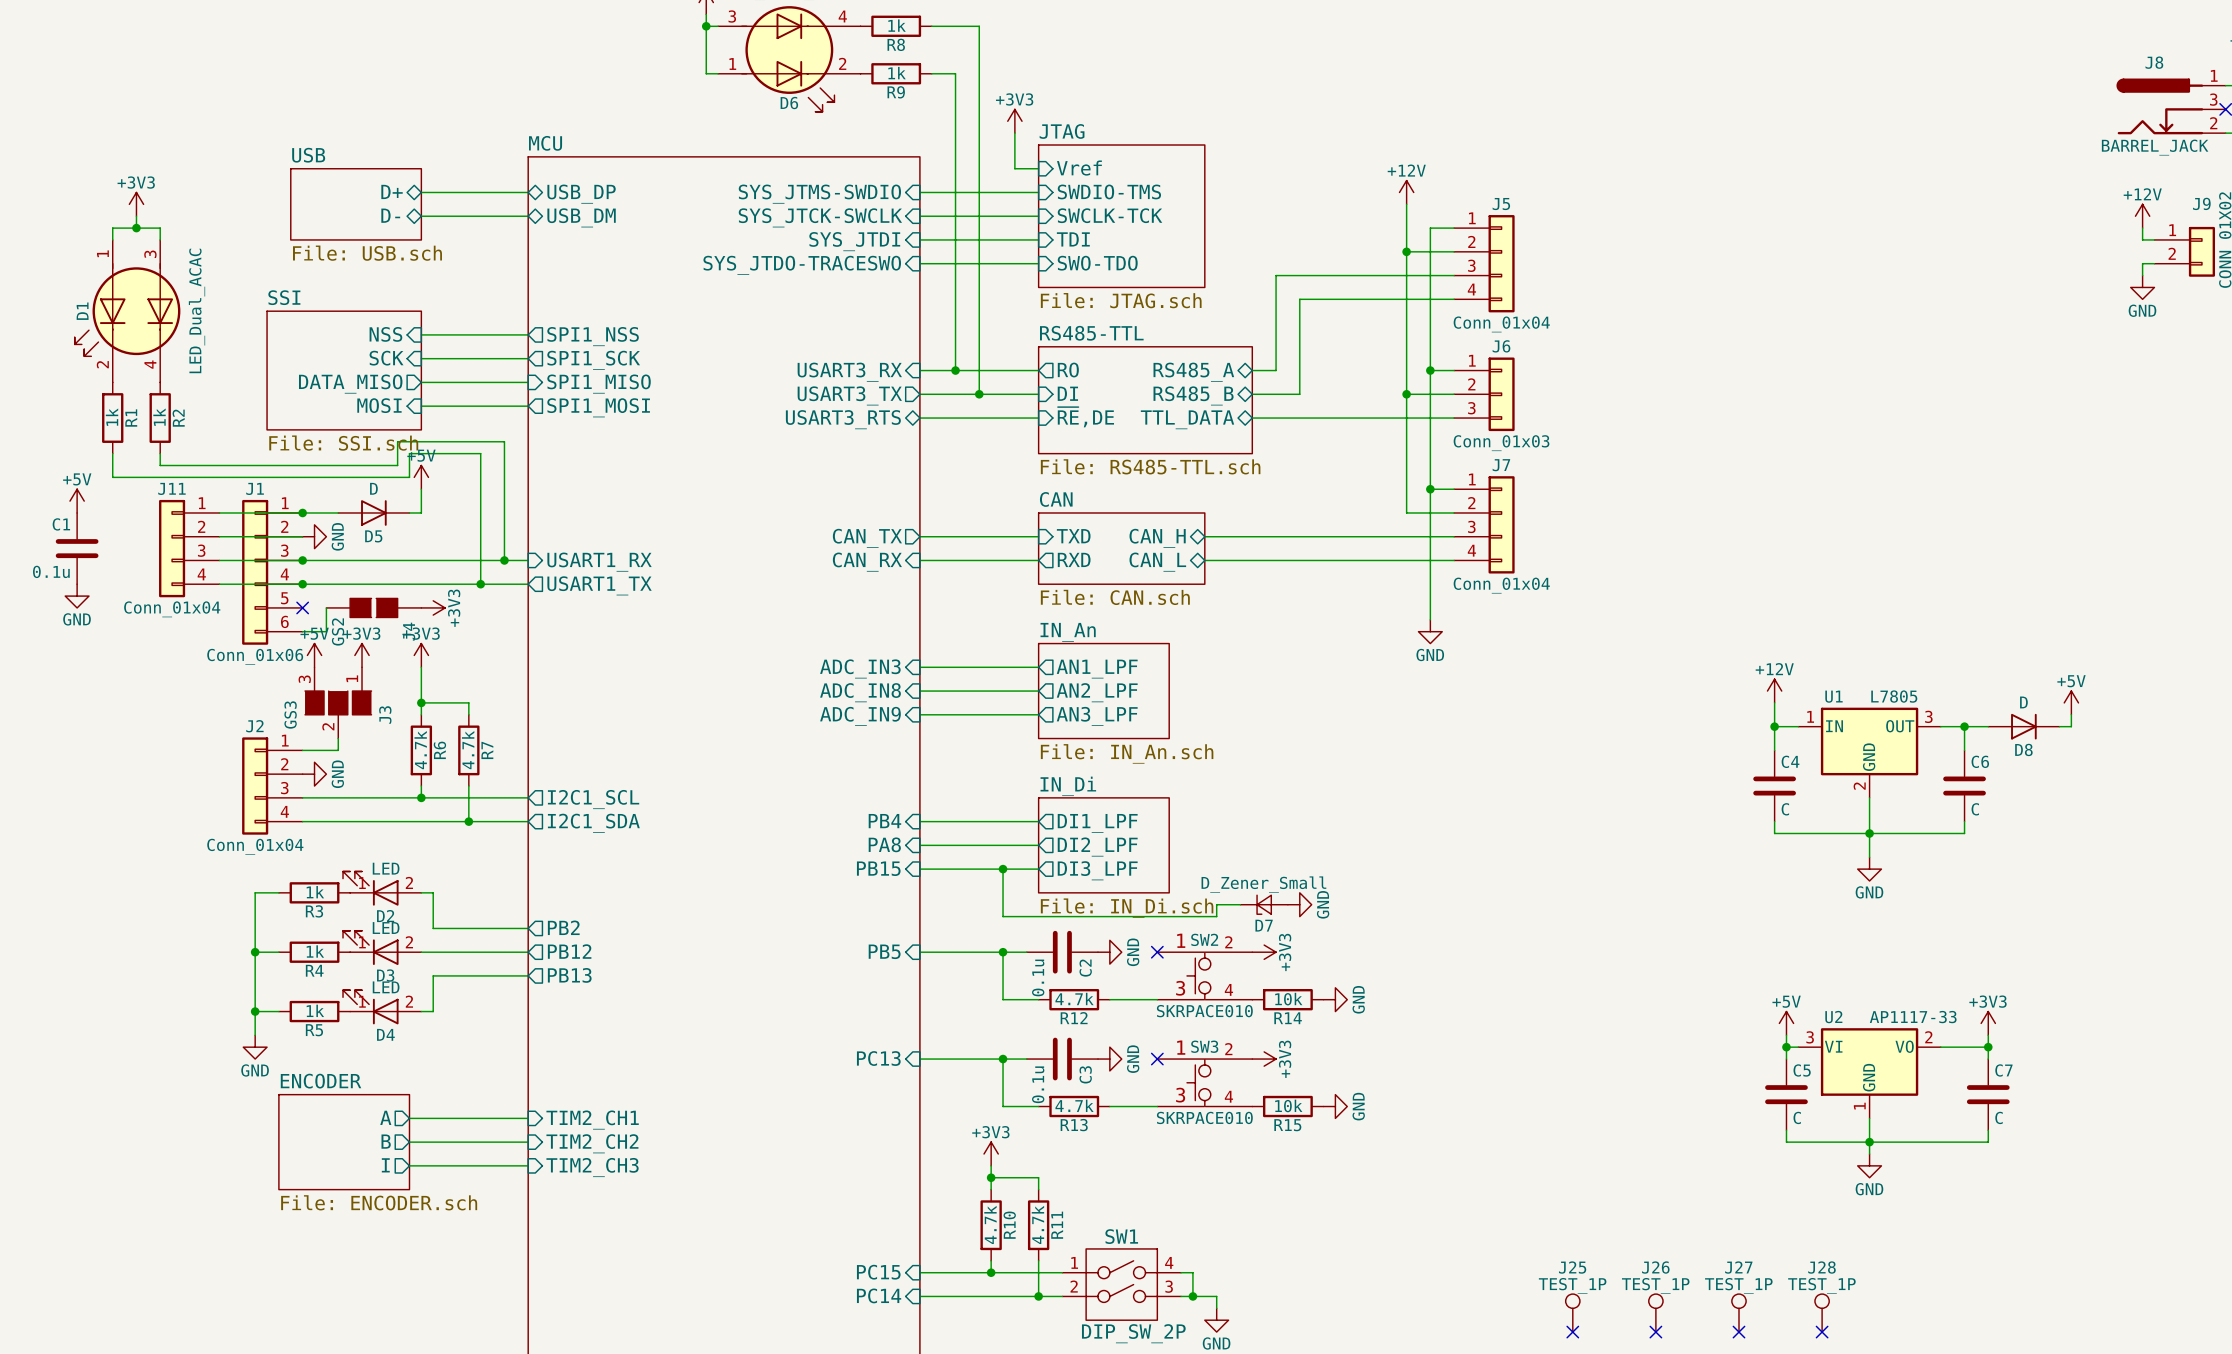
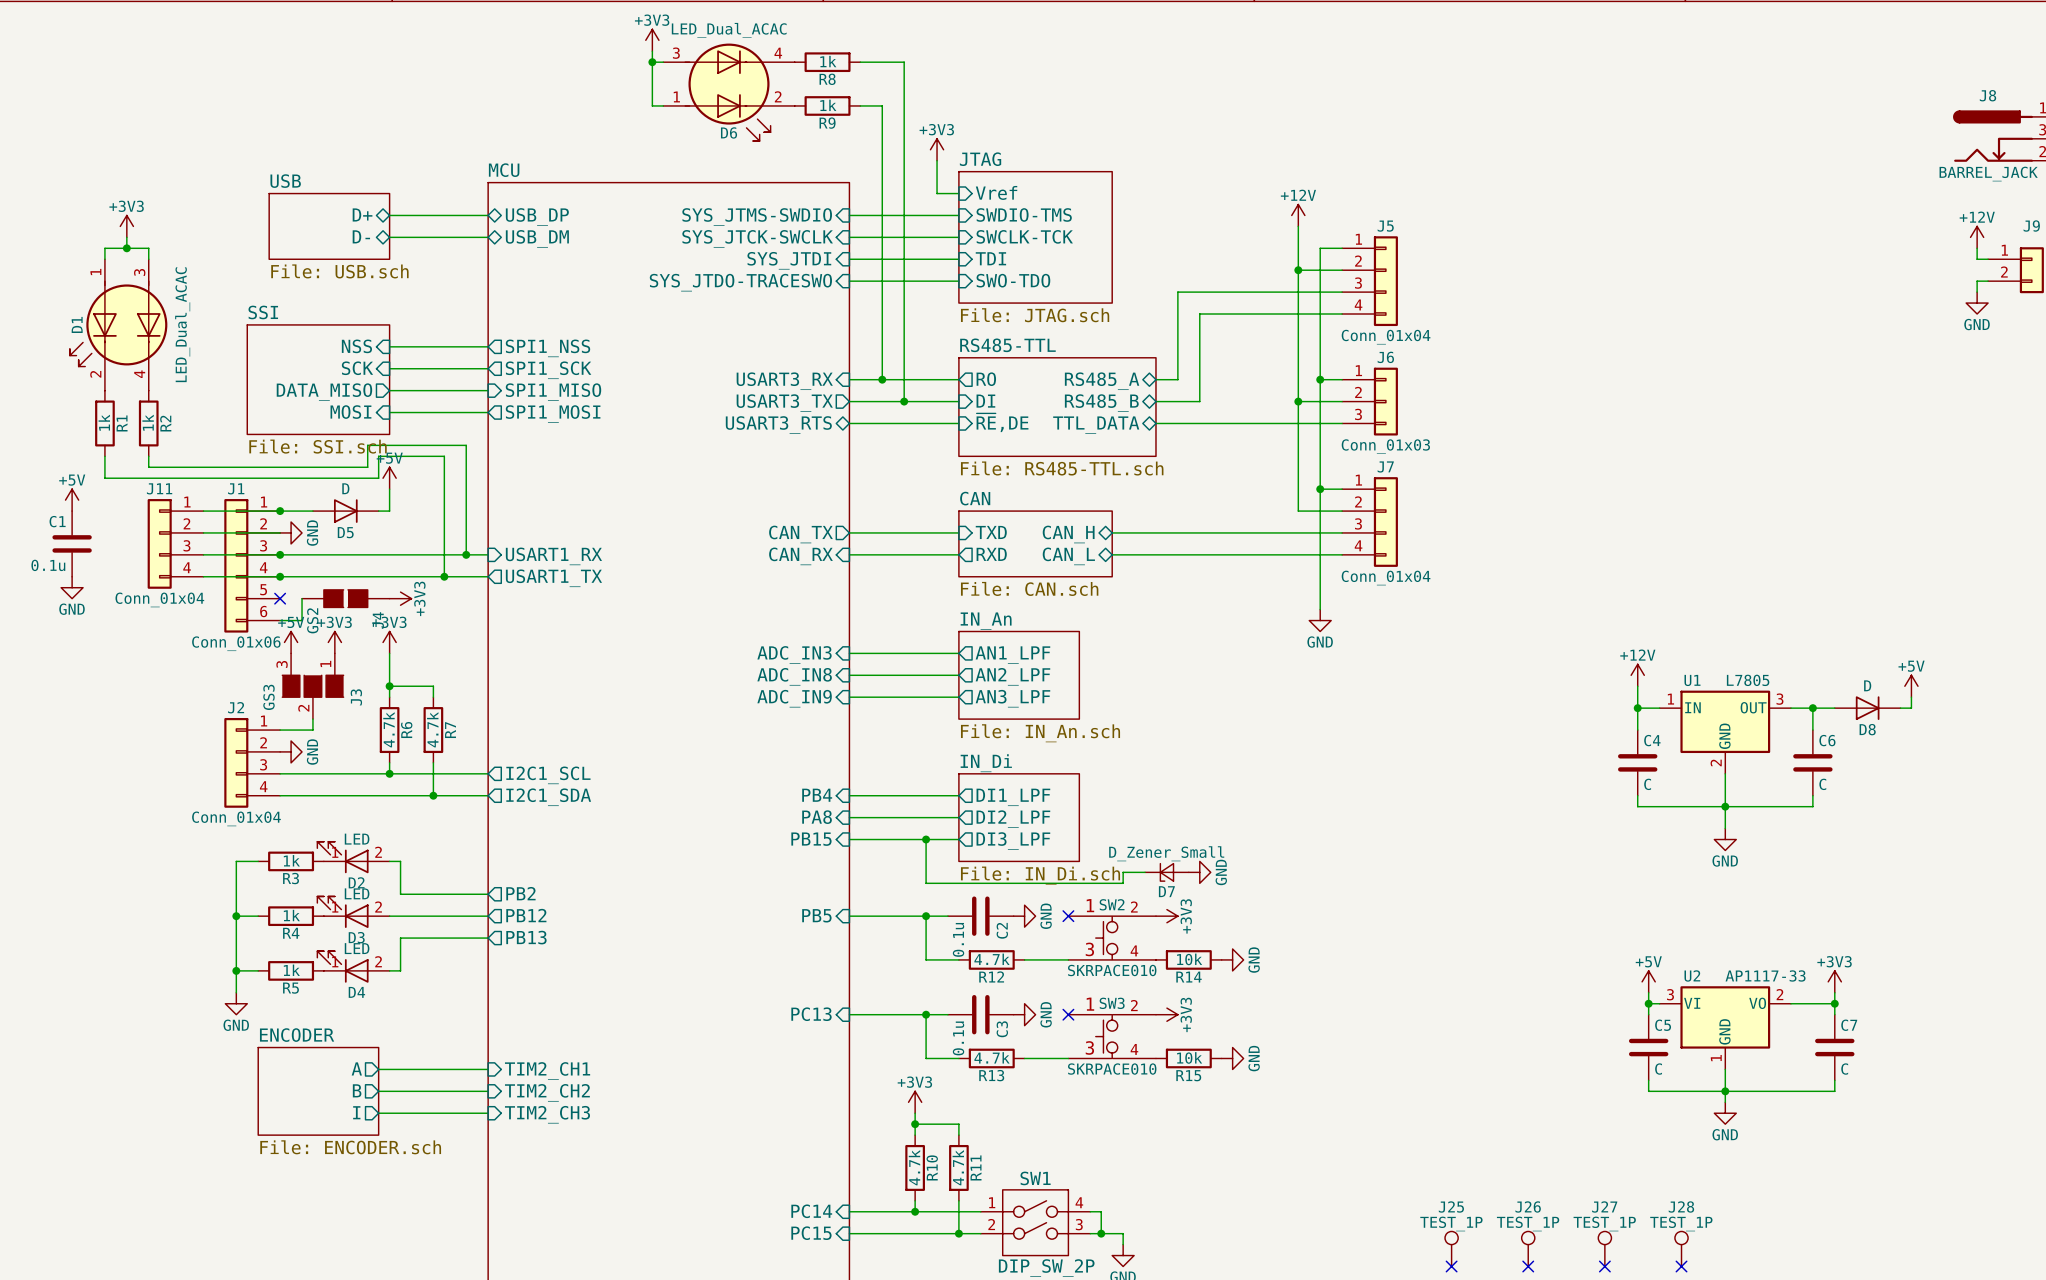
sheet pin: PC15 (878, 1272) -> PC14 (811, 1211)
sheet pin: PC14 (879, 1295) -> PC15 (811, 1233)

